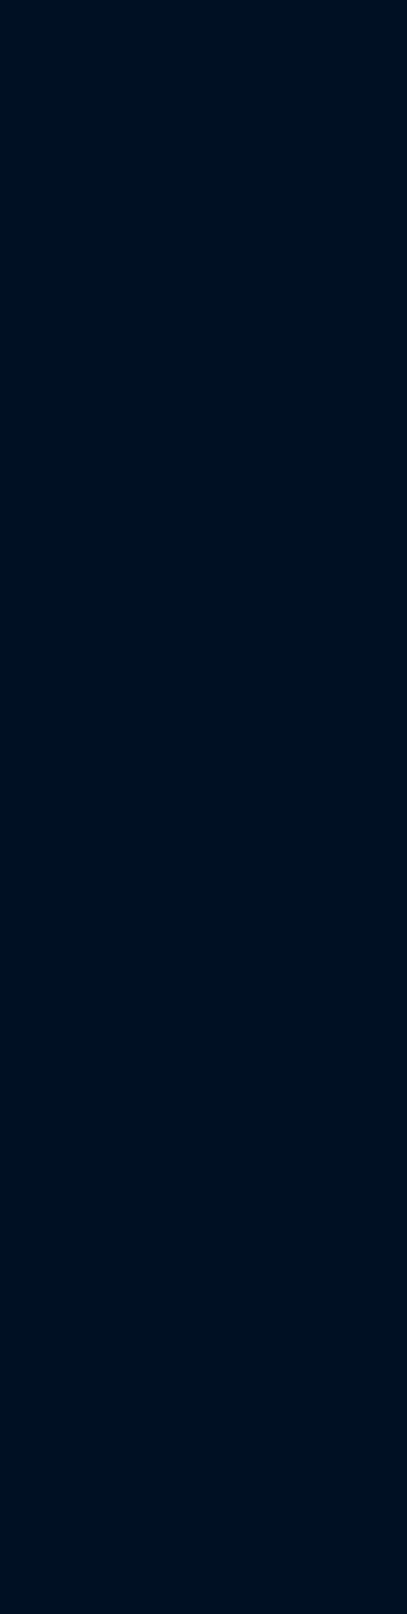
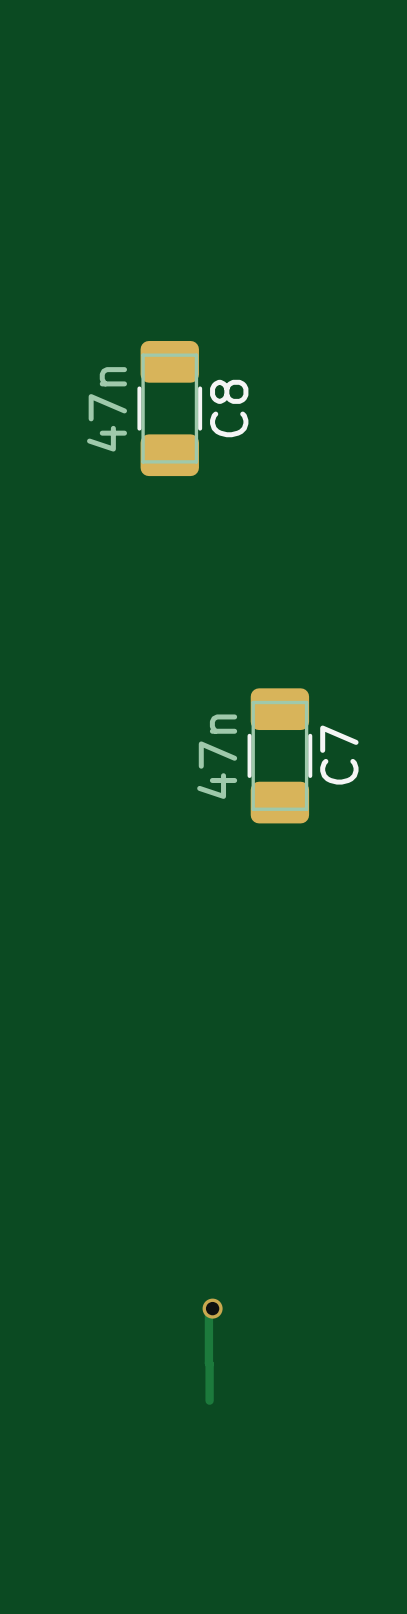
C8: none -> 47n (169, 408)
C7: none -> 47n (279, 755)
track: none -> (212, 1308) (208, 1312) (209, 1400)
via: none -> (212, 1308)

